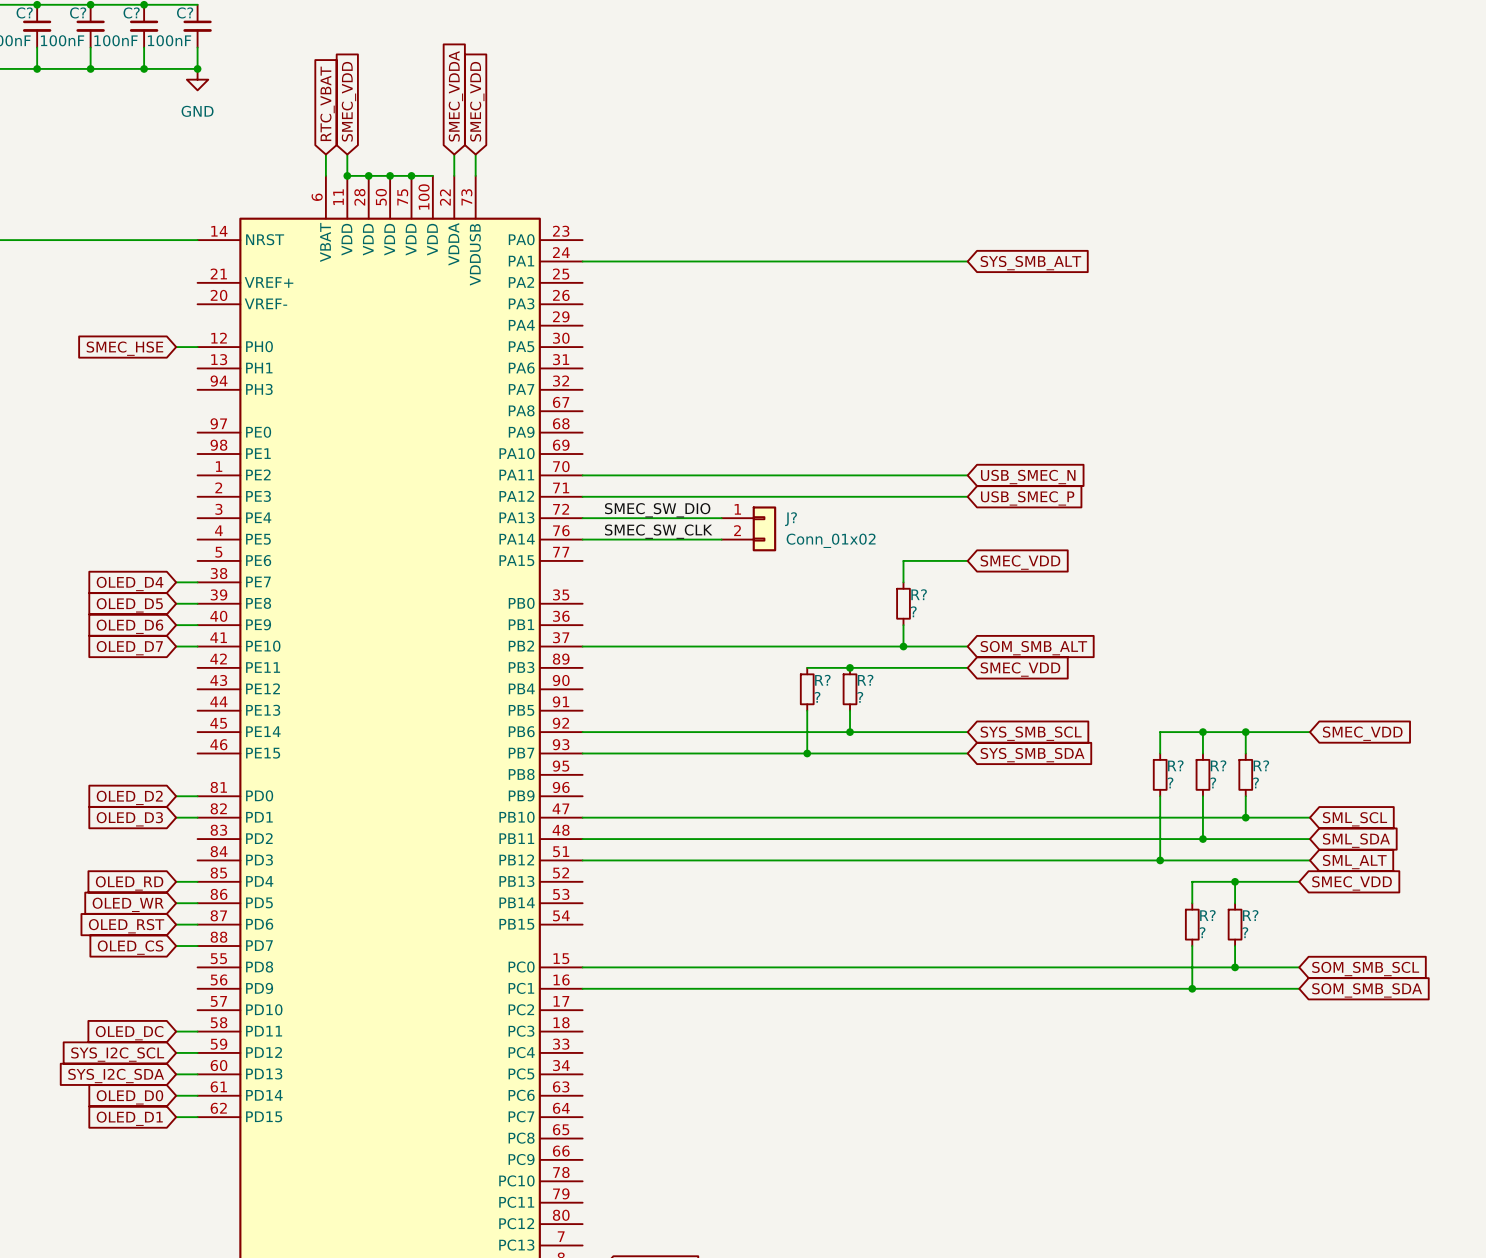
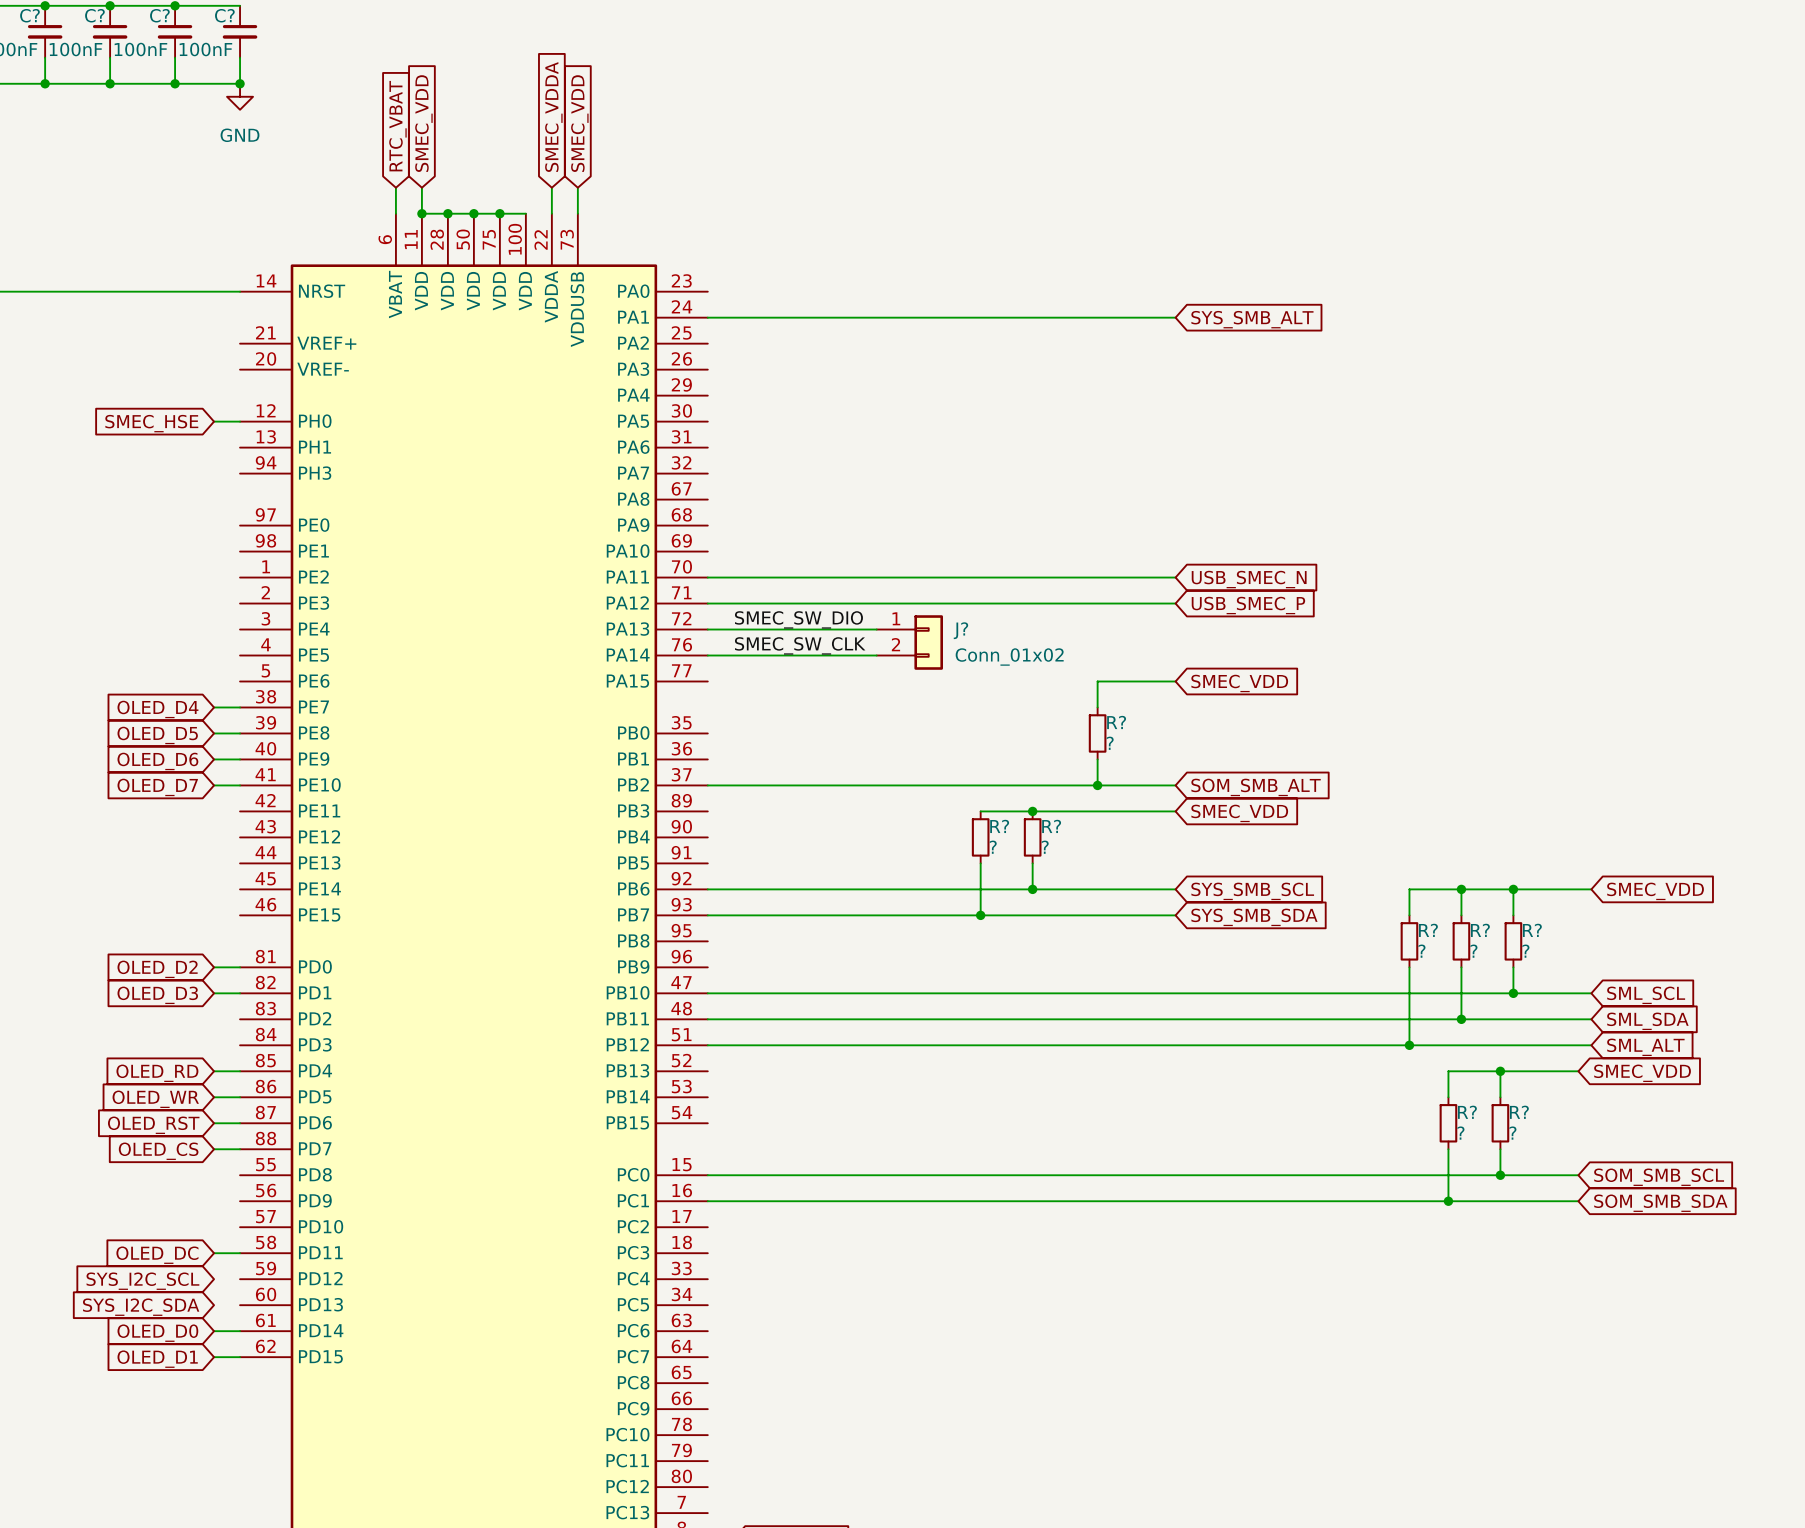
wire: (176, 1052) (197, 1052) -> none
wire: (176, 1074) (197, 1074) -> none

